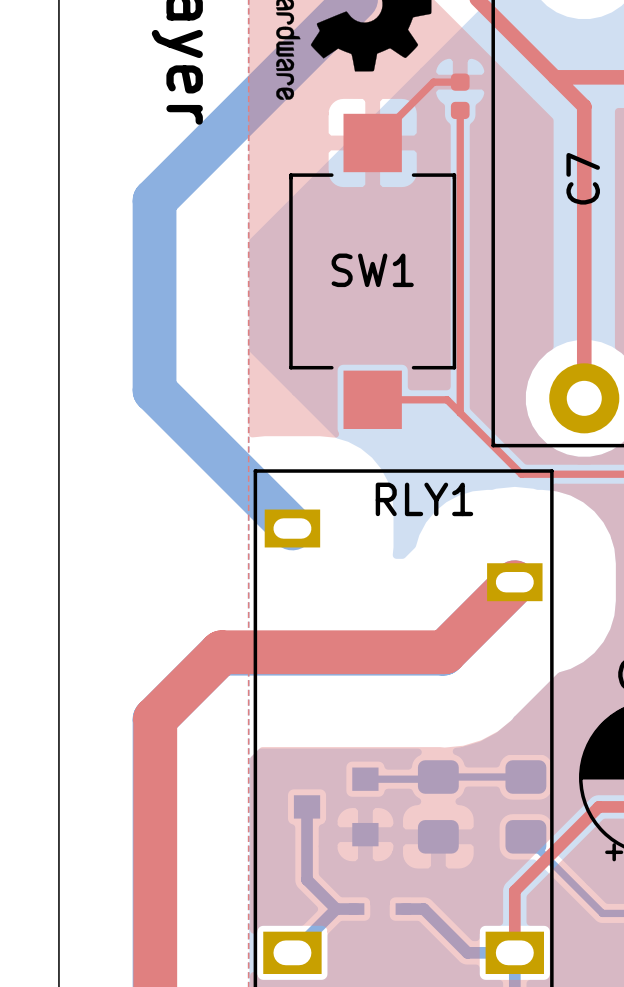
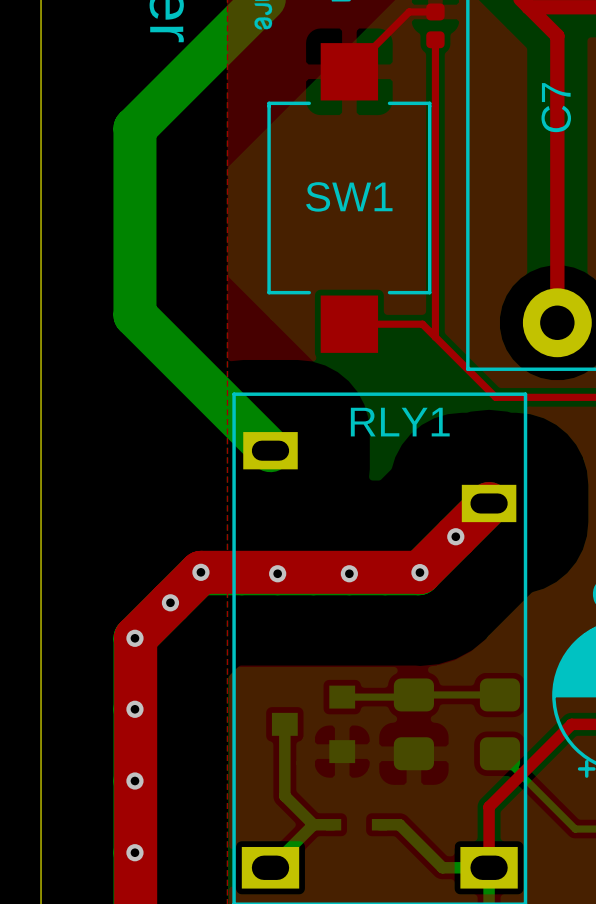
via: none -> (455, 536)
via: none -> (200, 572)
via: none -> (419, 572)
via: none -> (277, 573)
via: none -> (349, 573)
via: none -> (170, 602)
via: none -> (134, 638)
via: none -> (134, 709)
via: none -> (134, 781)
via: none -> (134, 852)

